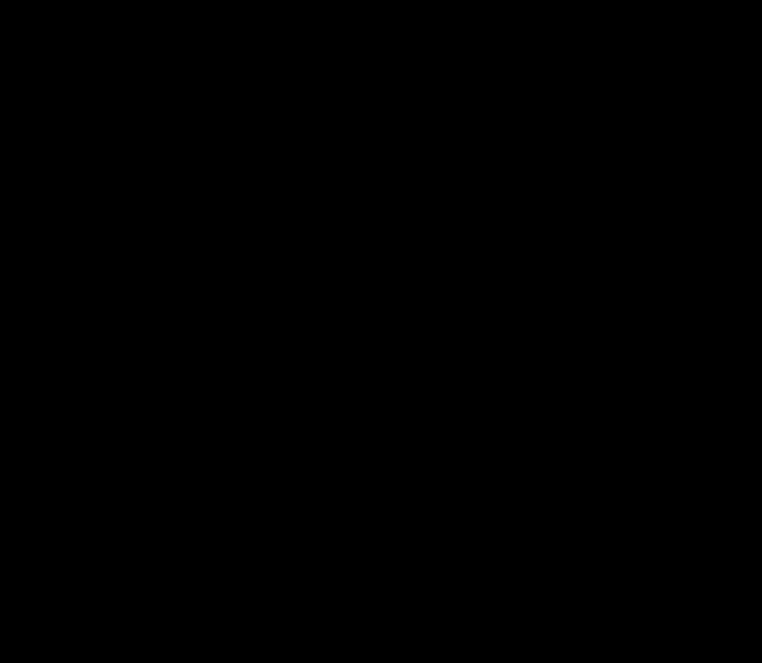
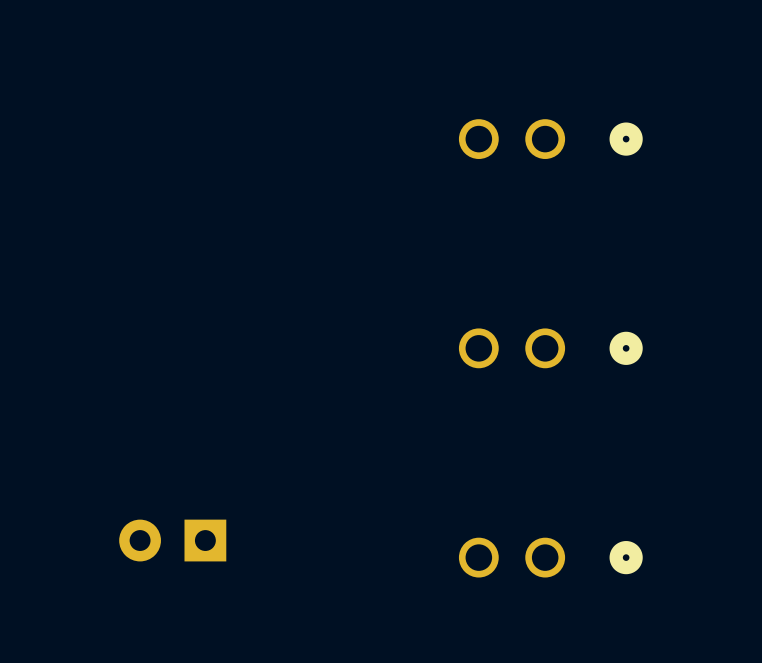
part: none -> (550, 139)
part: none -> (550, 348)
part: none -> (172, 540)
part: none -> (550, 557)

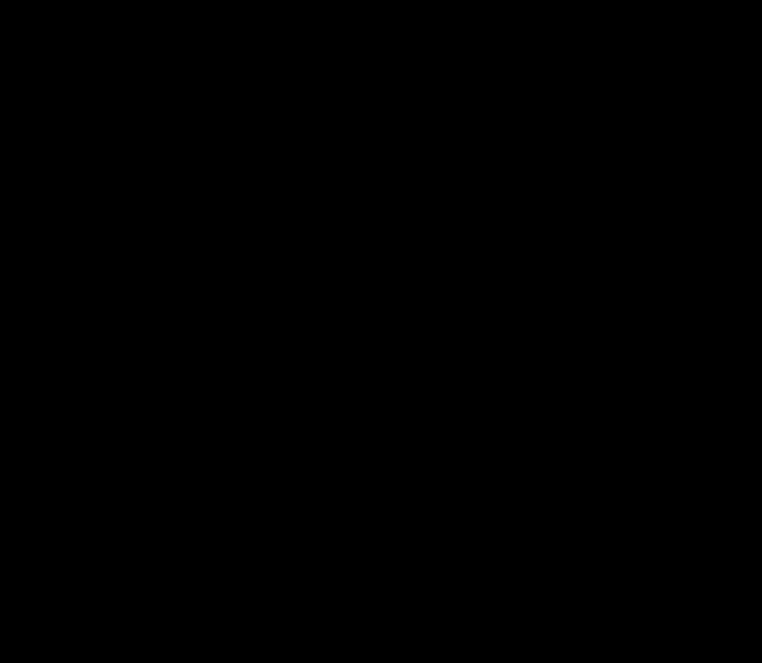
part: (550, 139) -> none
part: (550, 348) -> none
part: (172, 540) -> none
part: (550, 557) -> none

